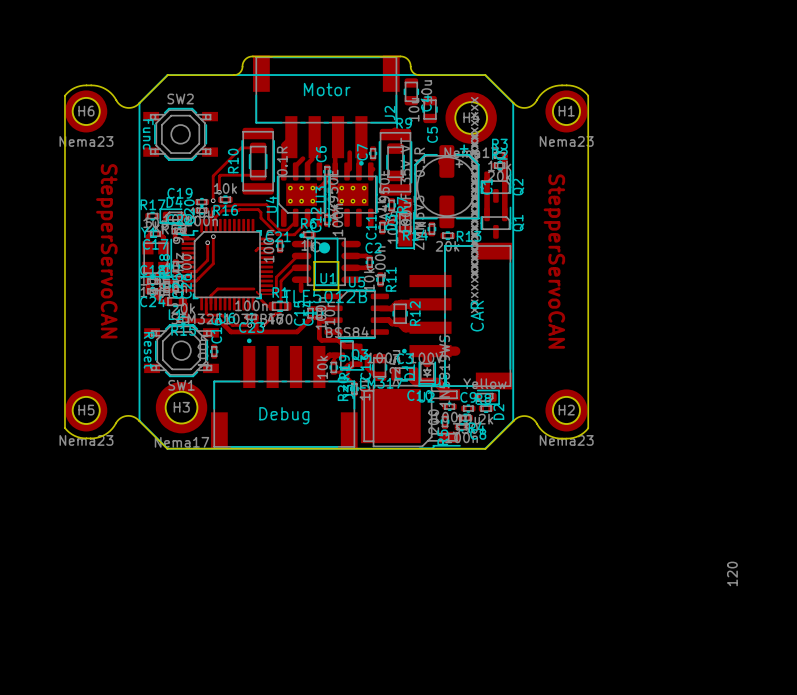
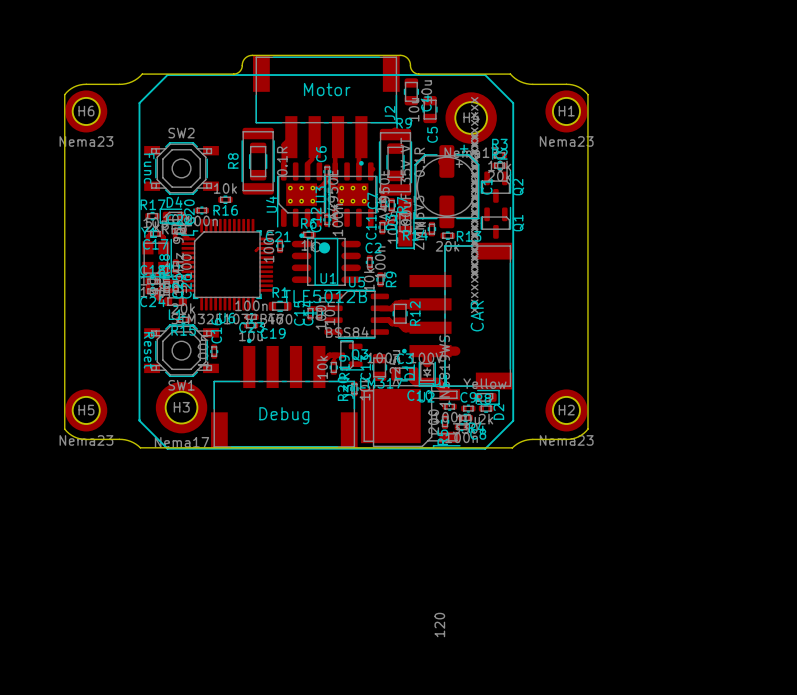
board edge: none -> (252, 55) (401, 55) (408, 59) (411, 69) (417, 74) (510, 74) (517, 80) (526, 83) (569, 84) (578, 86) (585, 92) (587, 94) (587, 429) (583, 433) (569, 439) (527, 439) (512, 447) (140, 447) (125, 439) (83, 439) (74, 436) (66, 431) (64, 429) (64, 94) (71, 88) (80, 84) (125, 83) (134, 80) (142, 74) (234, 74) (241, 69) (245, 58) (252, 55)
SW2 position: (180, 134) -> (181, 168)
track: (258, 147) (241, 147) (213, 176) (213, 200) -> none
track: (349, 152) (349, 168) (347, 171) -> none
C7 position: (373, 153) -> (383, 202)
track: (504, 155) (504, 214) -> none
track: (303, 158) (295, 165) (295, 171) -> none
R10 name: R10 (233, 160) -> R8 (233, 160)
track: (258, 175) (220, 175) (219, 192) -> none
track: (487, 178) (487, 214) -> none
via: (219, 192) -> none
C19 name position: C19 (179, 193) -> C19 (273, 333)
via: (213, 200) -> none
C19 position: (201, 202) -> (251, 325)
track: (295, 217) (295, 221) (287, 230) (279, 230) (268, 218) (268, 206) (266, 204) (215, 206) (212, 208) (210, 225) -> none
track: (307, 217) (307, 221) (294, 234) (277, 234) (260, 218) (260, 212) (258, 209) (222, 210) (215, 217) (215, 225) -> none
track: (213, 236) (213, 263) (196, 281) (188, 281) -> none
via: (213, 236) -> none
track: (207, 242) (207, 260) (196, 271) (188, 271) -> none
via: (207, 242) -> none
text: StepperServoCAN (106, 251) -> none
track: (301, 255) (297, 255) (276, 277) (276, 294) -> none
track: (359, 255) (369, 257) -> none
board edge: (314, 261) (338, 261) (338, 289) (314, 289) (314, 261) -> none
text: StepperServoCAN (554, 261) -> none
track: (369, 266) (359, 267) -> none
track: (301, 267) (294, 267) (281, 281) (280, 311) (262, 325) -> none
R11 name: R11 (391, 279) -> R9 (391, 279)
track: (301, 284) (301, 290) -> none
track: (253, 288) (217, 288) (210, 295) (210, 303) -> none
track: (256, 291) (258, 294) (276, 294) -> none
track: (261, 300) (267, 306) (272, 306) -> none
track: (182, 301) (185, 304) (185, 317) (189, 320) (219, 320) (231, 331) (297, 331) (311, 317) (319, 317) -> none
track: (206, 303) (208, 315) (222, 315) (232, 325) (249, 325) -> none
track: (256, 317) (256, 331) -> none
track: (333, 321) (323, 321) (319, 318) (319, 338) (321, 340) (338, 340) (344, 346) (356, 346) (367, 357) (367, 367) (376, 376) (379, 376) -> none
via: (249, 325) -> none
track: (333, 372) (339, 372) (347, 364) (355, 364) (347, 372) (347, 377) (354, 384) -> none
board edge: (513, 420) (520, 416) (529, 416) (544, 432) (558, 438) (575, 437) (588, 428) (588, 95) (583, 91) (569, 85) (552, 86) (542, 93) (532, 105) (522, 107) (514, 104) (485, 75) (416, 74) (411, 70) (408, 60) (402, 56) (252, 56) (245, 59) (241, 70) (236, 74) (167, 75) (138, 104) (132, 107) (120, 105) (108, 91) (97, 85) (77, 86) (64, 95) (64, 428) (69, 432) (83, 438) (99, 437) (110, 430) (120, 418) (128, 415) (137, 419) (167, 448) (485, 448) -> none
board edge: (513, 420) (485, 448) -> none
R12 value position: 120 (732, 573) -> 120 (439, 625)

